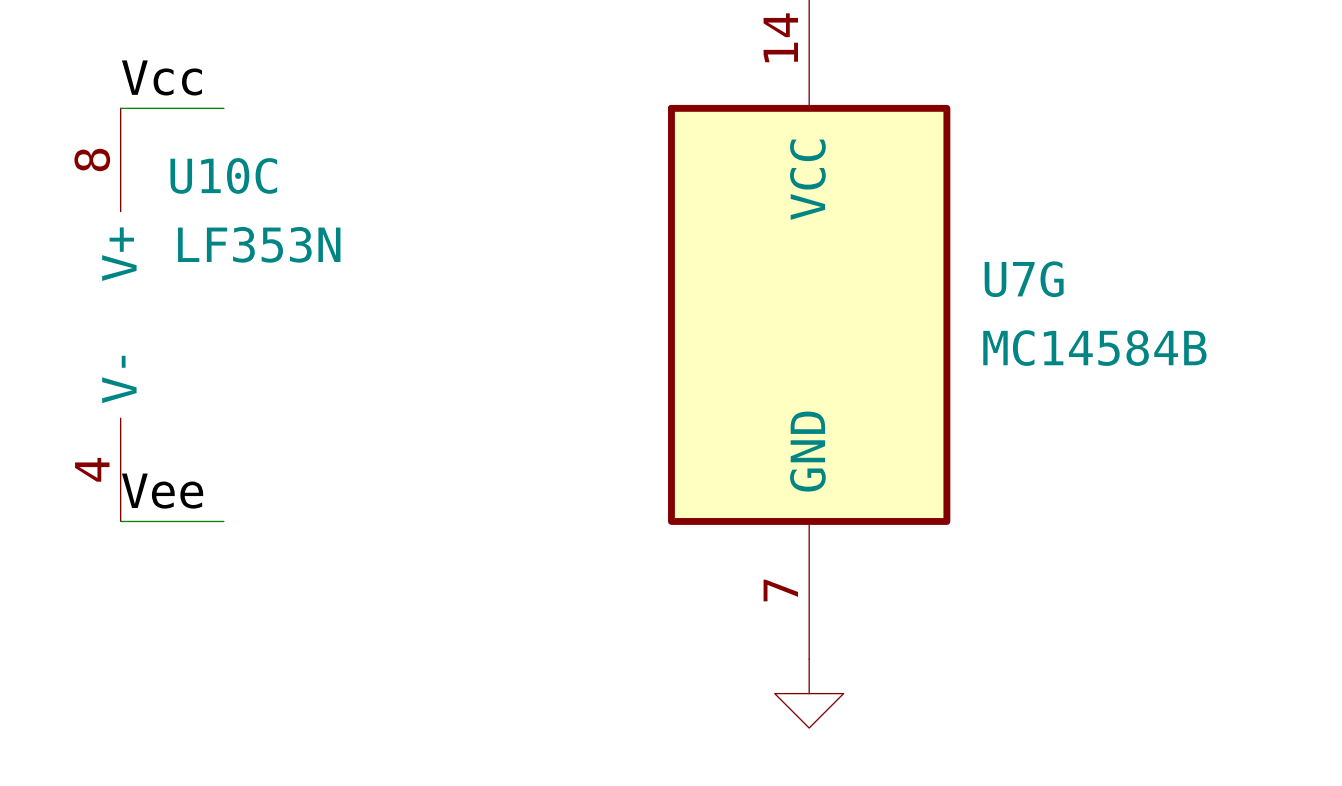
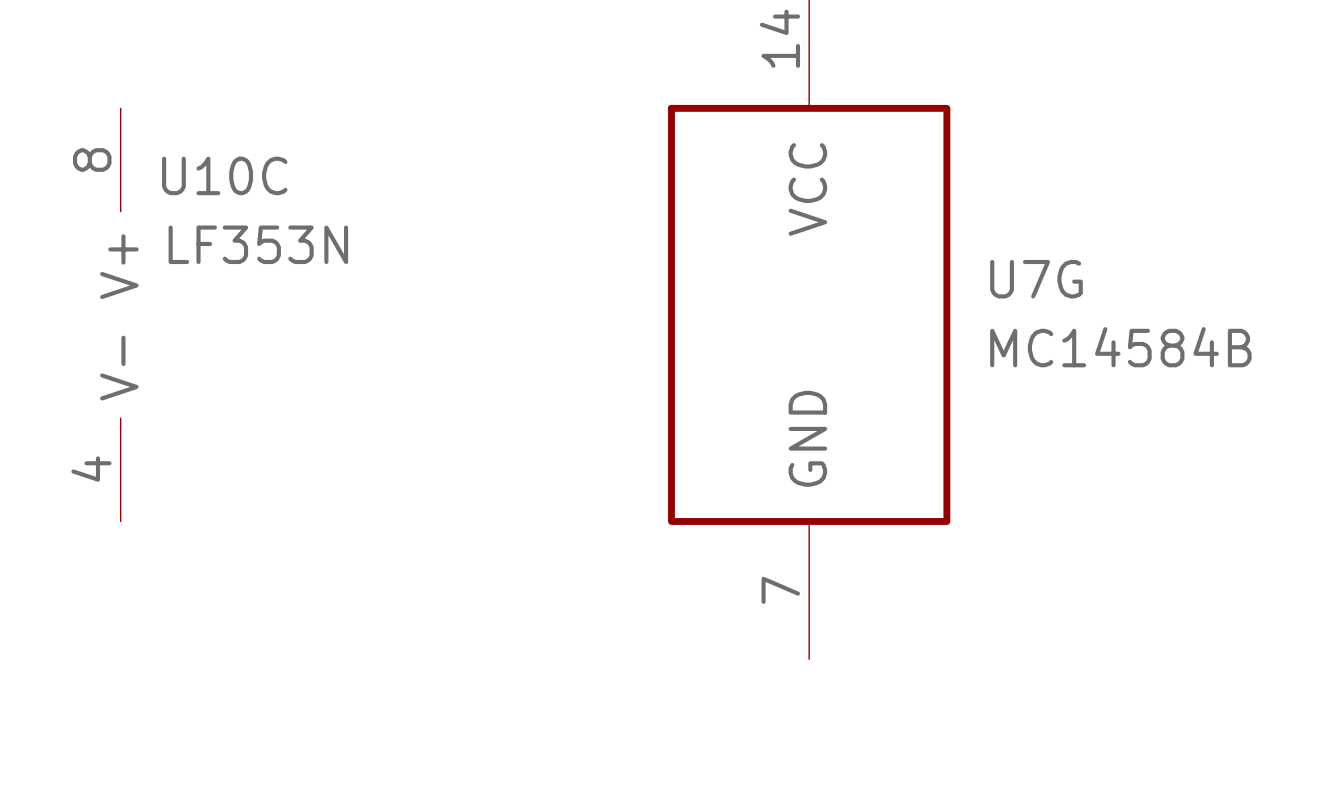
label: Vcc (161, 77) -> none
wire: (120, 108) (223, 108) -> none
label: Vee (162, 491) -> none
wire: (120, 521) (223, 521) -> none
power symbol: (809, 693) -> none

